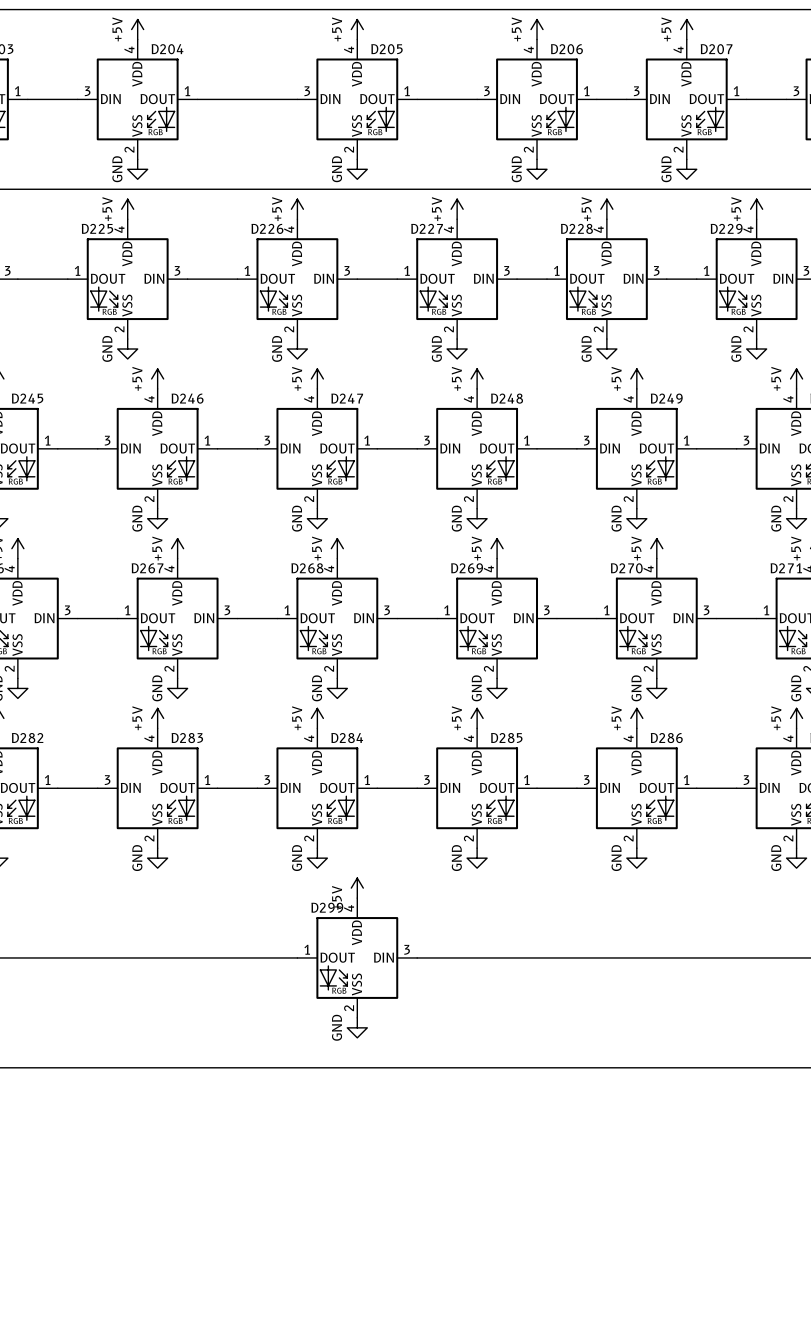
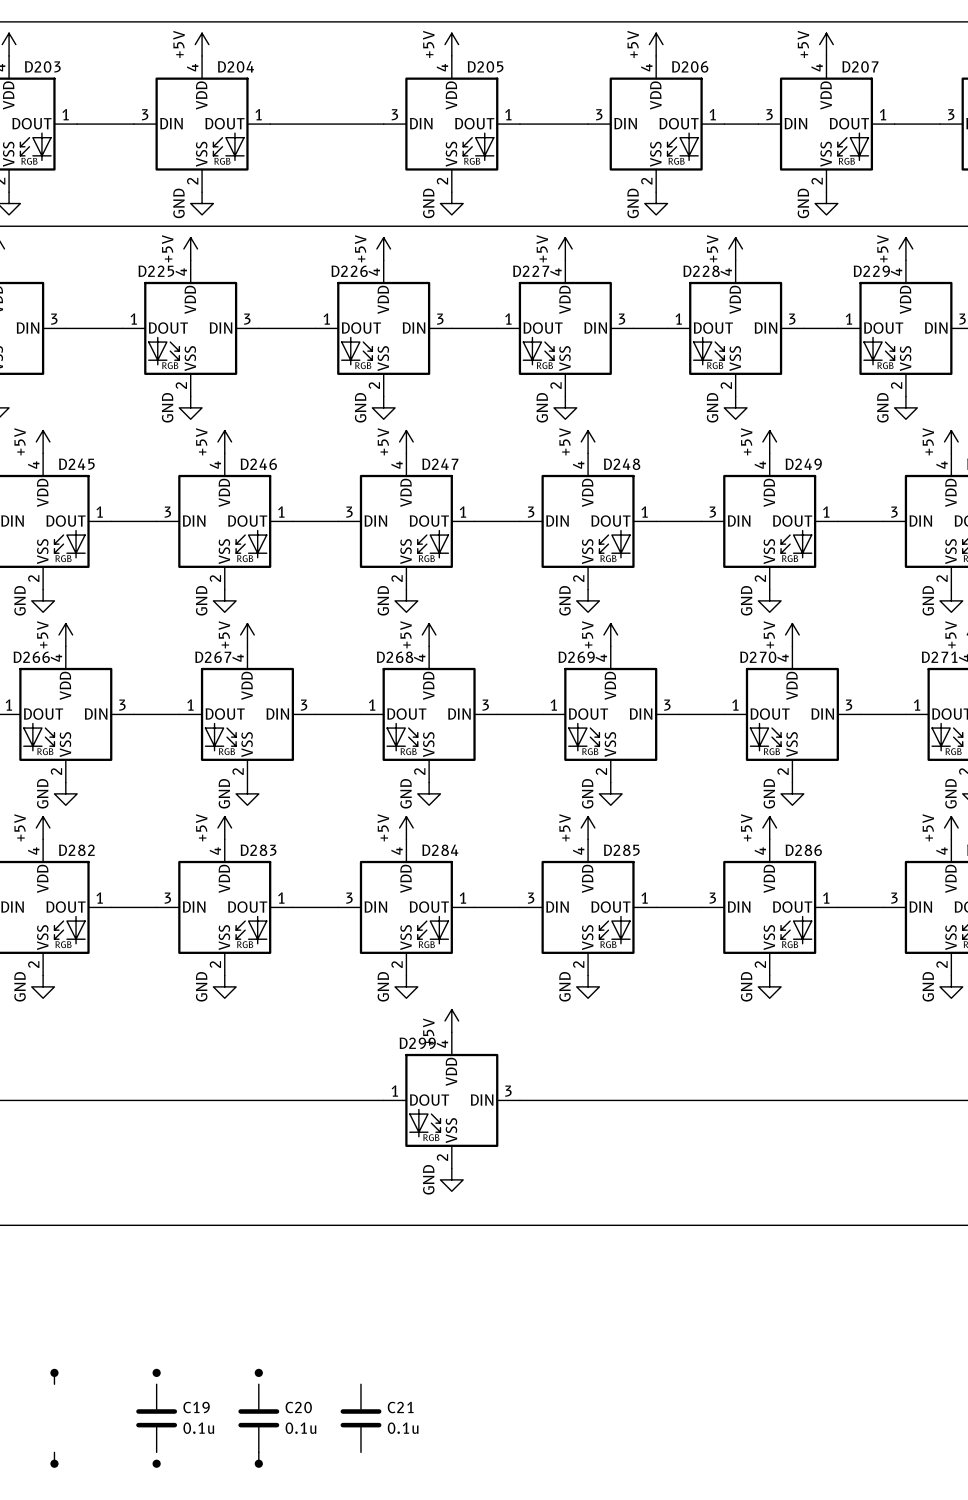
wire: none -> (54, 1372) (54, 1384)
junction: none -> (54, 1372)
junction: none -> (156, 1372)
junction: none -> (258, 1372)
C19: none -> 0.1u (156, 1418)
C20: none -> 0.1u (258, 1418)
C21: none -> 0.1u (360, 1418)
wire: none -> (54, 1452) (54, 1463)
wire: none -> (258, 1452) (258, 1463)
junction: none -> (54, 1463)
junction: none -> (156, 1463)
junction: none -> (258, 1463)

